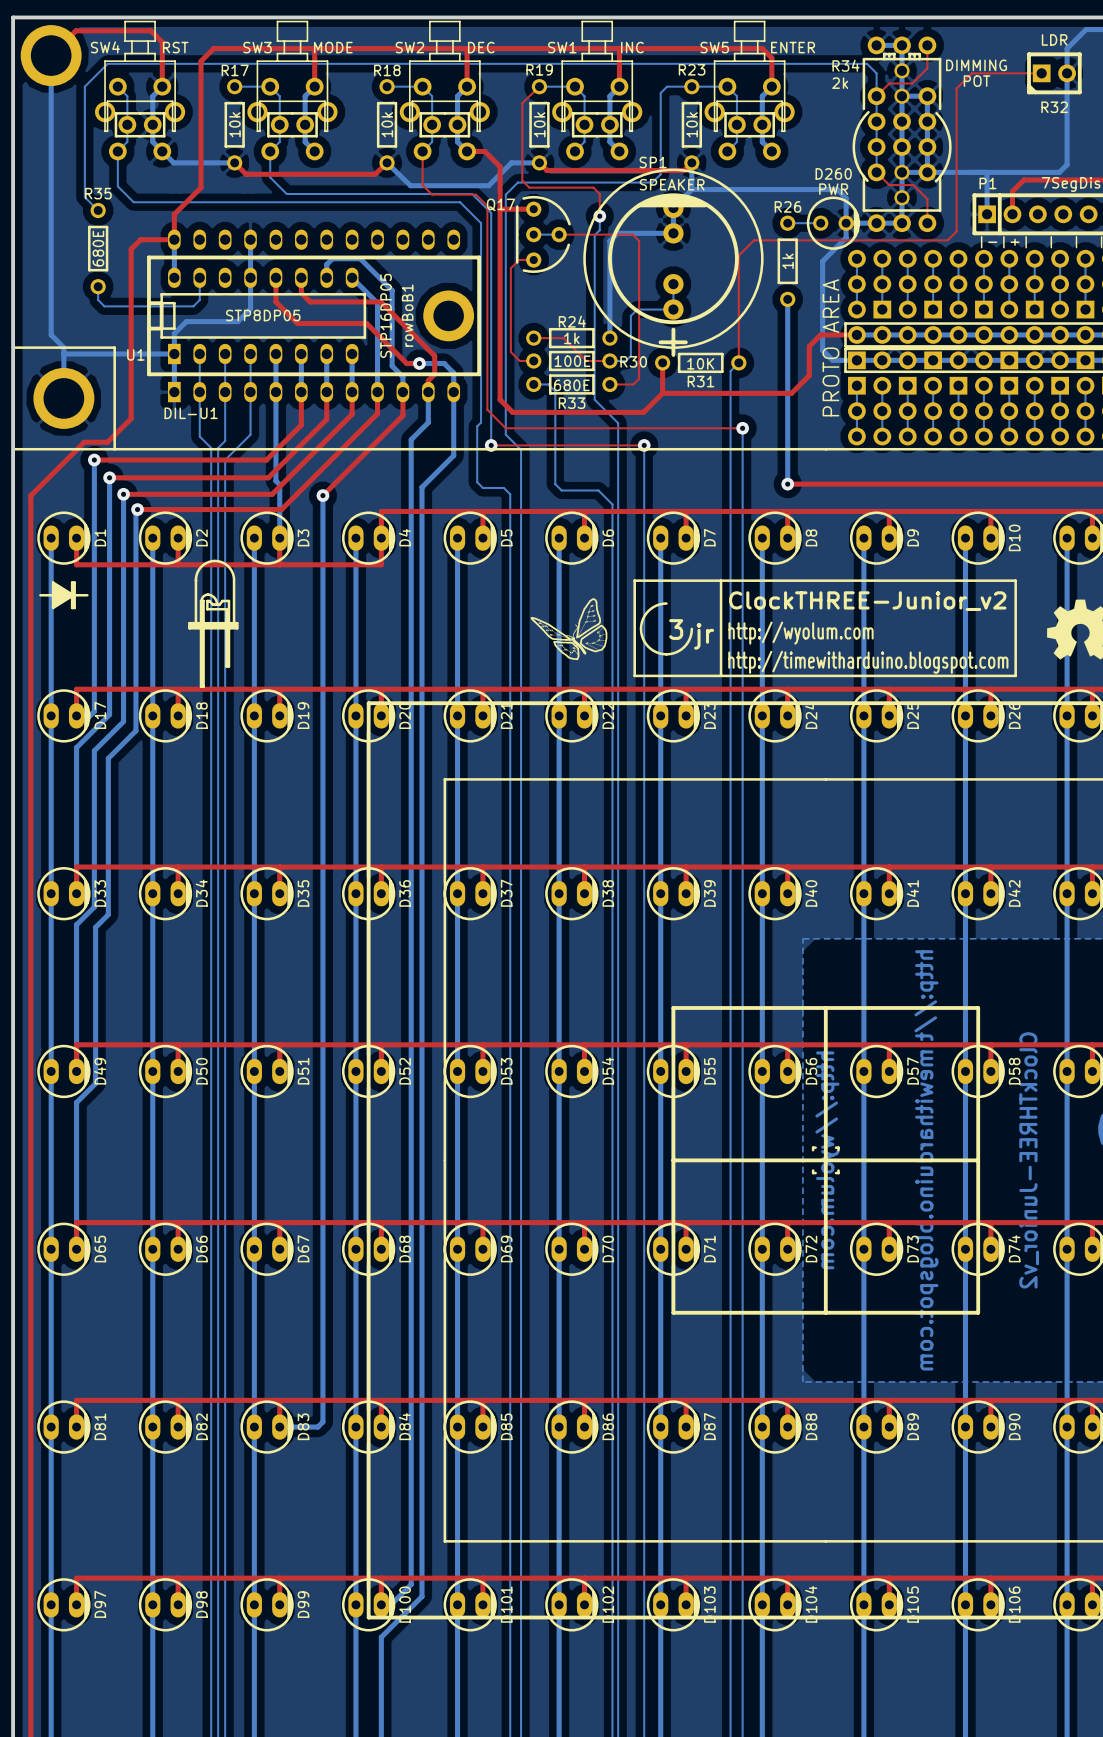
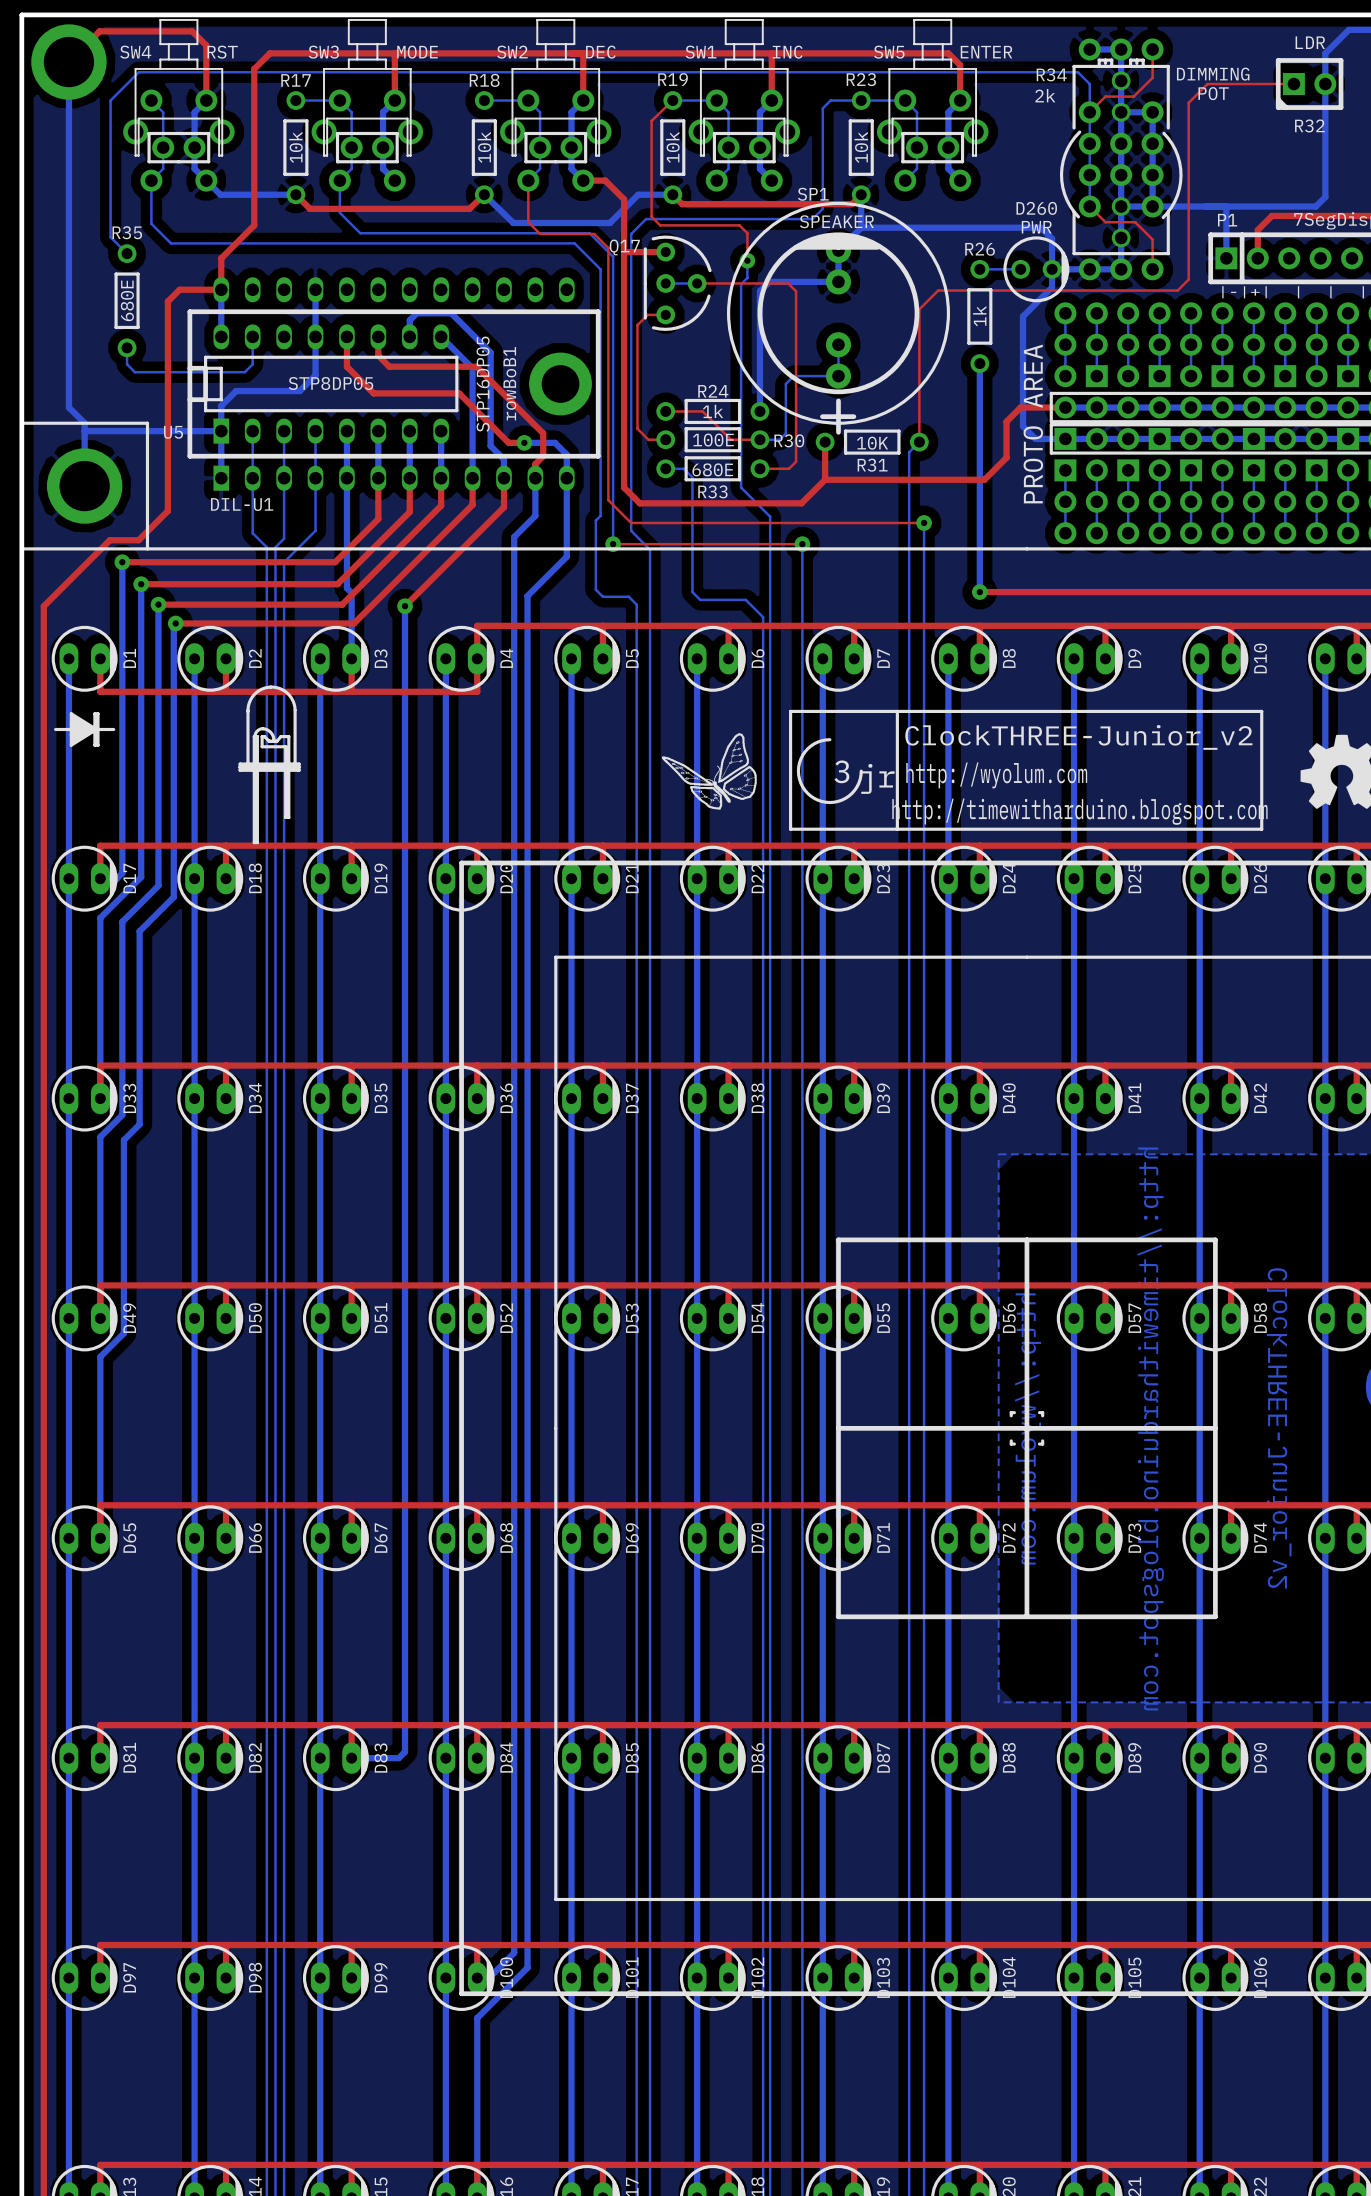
U1 name: U1 (135, 354) -> U5 (173, 432)

